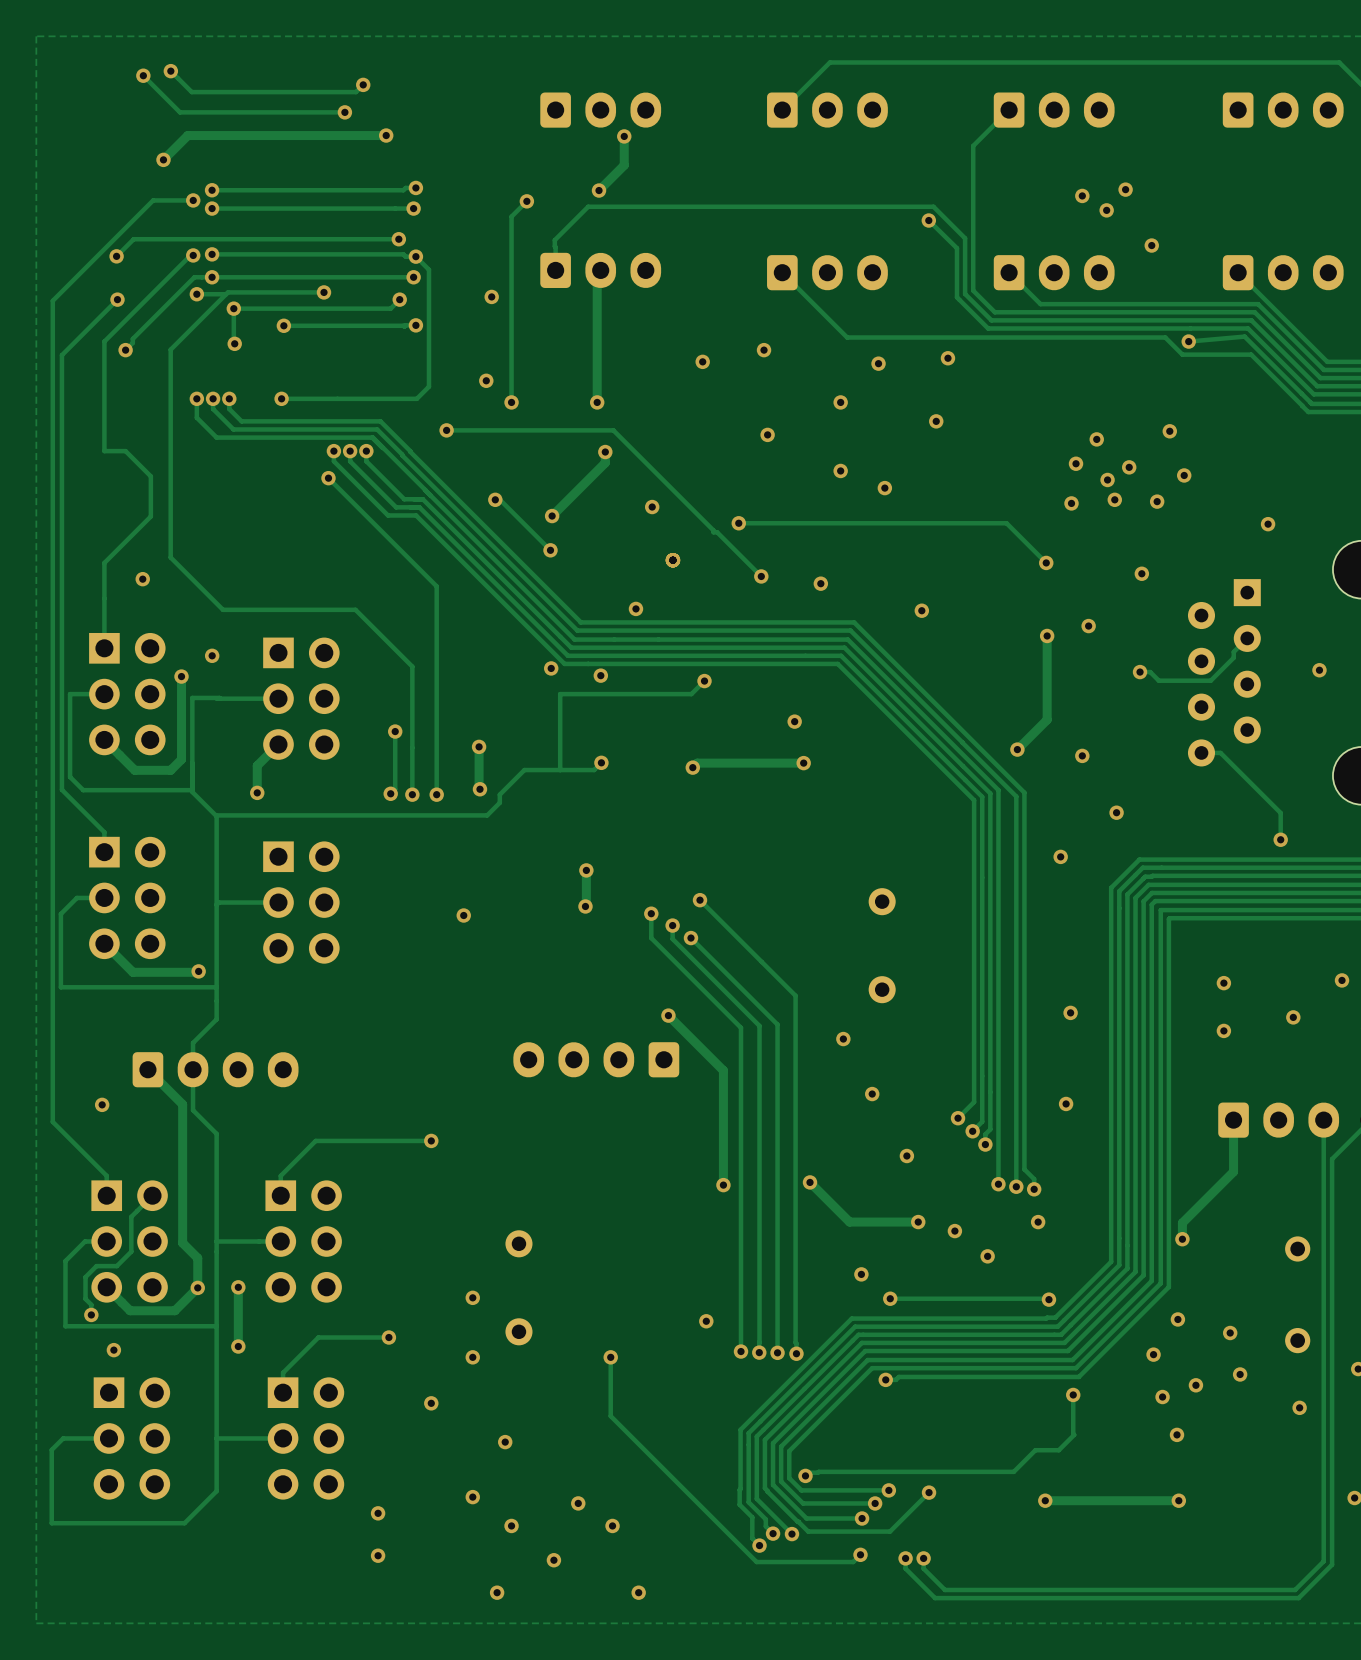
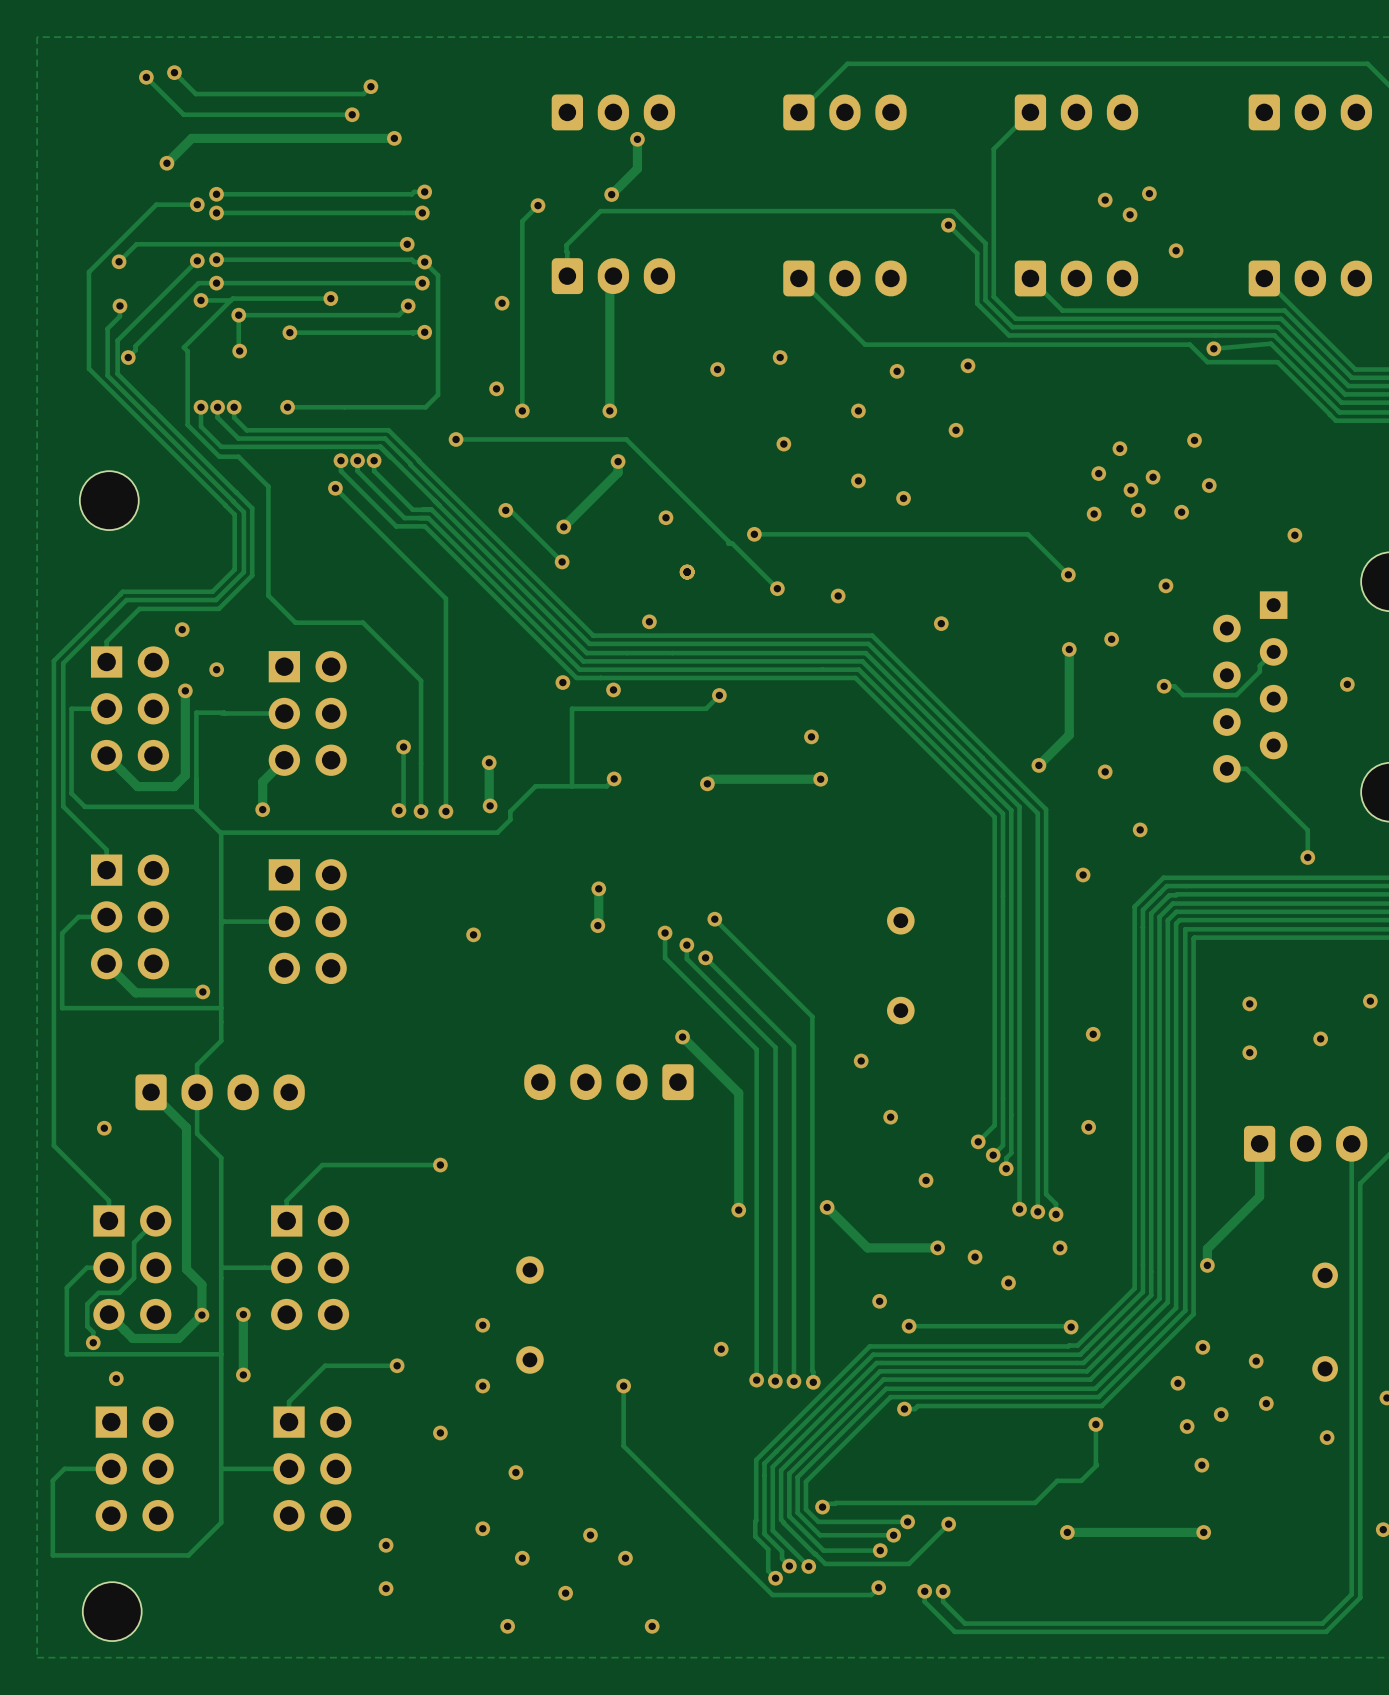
track: (193, 255) (190, 255) (104, 341) (104, 451) (125, 451) (150, 476) (150, 516) (104, 562) (104, 628) -> (197, 260) (117, 340) (117, 373) (236, 492)
track: (87, 266) (52, 300) (52, 647) -> (88, 272) (88, 368) (225, 505)
track: (117, 299) (61, 355) (61, 649) -> (233, 501) (243, 512) (243, 572) (215, 600) (126, 600) (63, 663)
track: none -> (119, 305) (119, 316) (107, 328) (107, 375) (233, 501)
track: (180, 340) (170, 349) (170, 557) (222, 609) (289, 609) -> (183, 347) (187, 351) (187, 424) (219, 456) (238, 456) (268, 486) (268, 595) (295, 622)
track: none -> (236, 492) (252, 508) (252, 575) (218, 608) (139, 608) (106, 641)
part: none -> (109, 500)
track: none -> (225, 505) (234, 514) (234, 569) (212, 591) (122, 591) (120, 593)
via position: (142, 579) -> (182, 629)
track: none -> (120, 594) (53, 660)
part: none -> (112, 1611)

